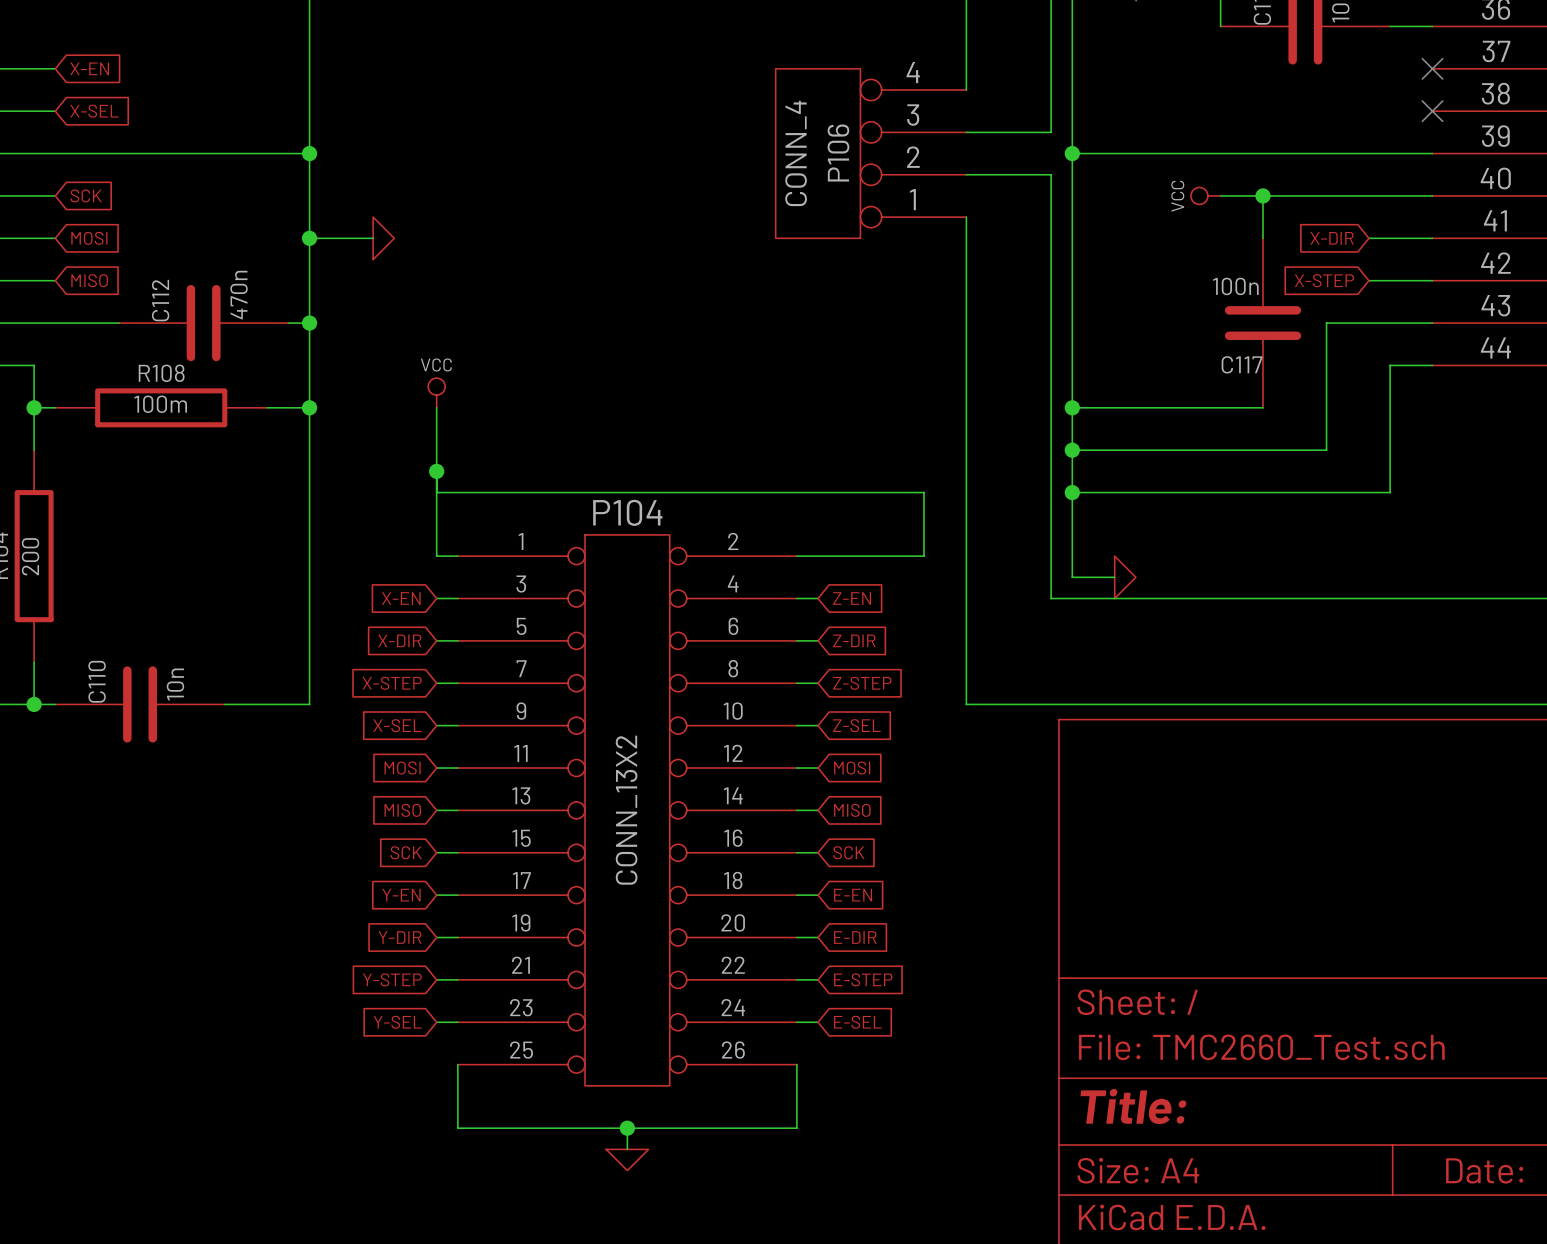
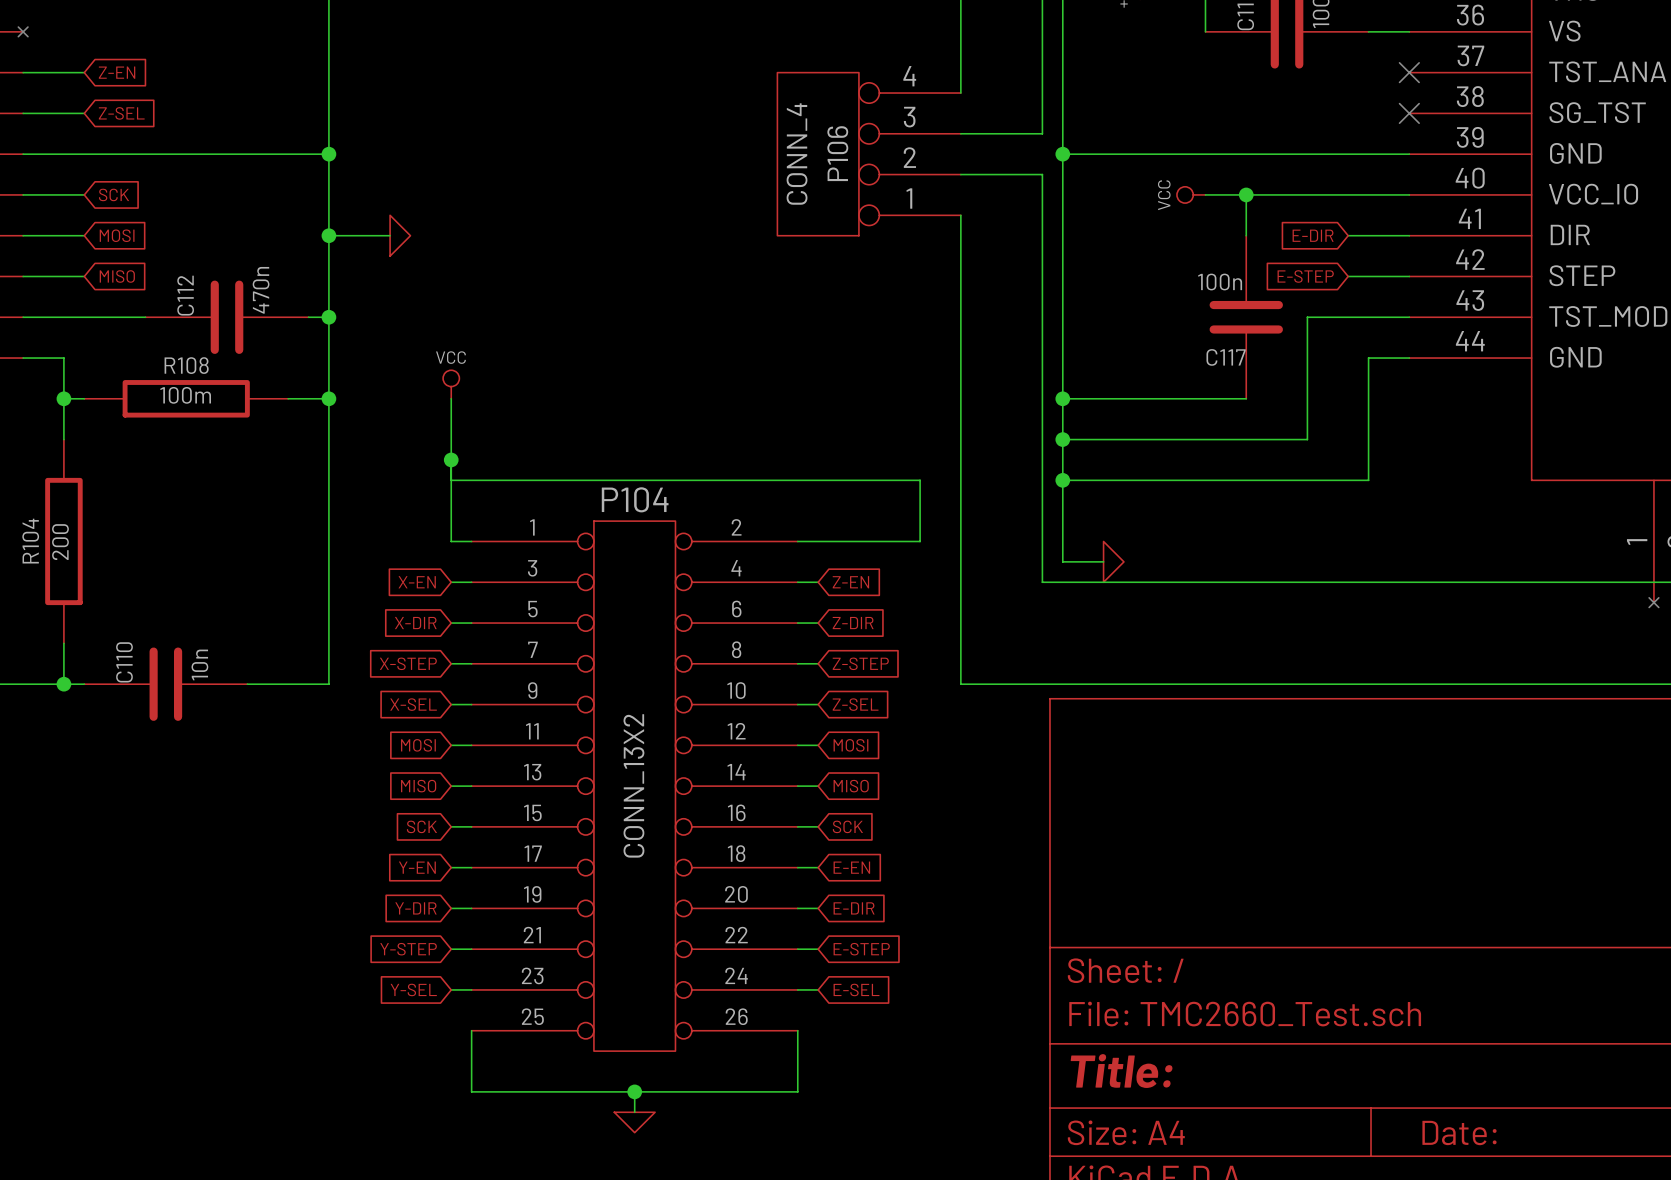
global label: X-EN (89, 68) -> Z-EN (117, 72)
global label: X-SEL (94, 111) -> Z-SEL (121, 113)
global label: X-DIR (1332, 238) -> E-DIR (1313, 235)
global label: X-STEP (1324, 280) -> E-STEP (1305, 276)

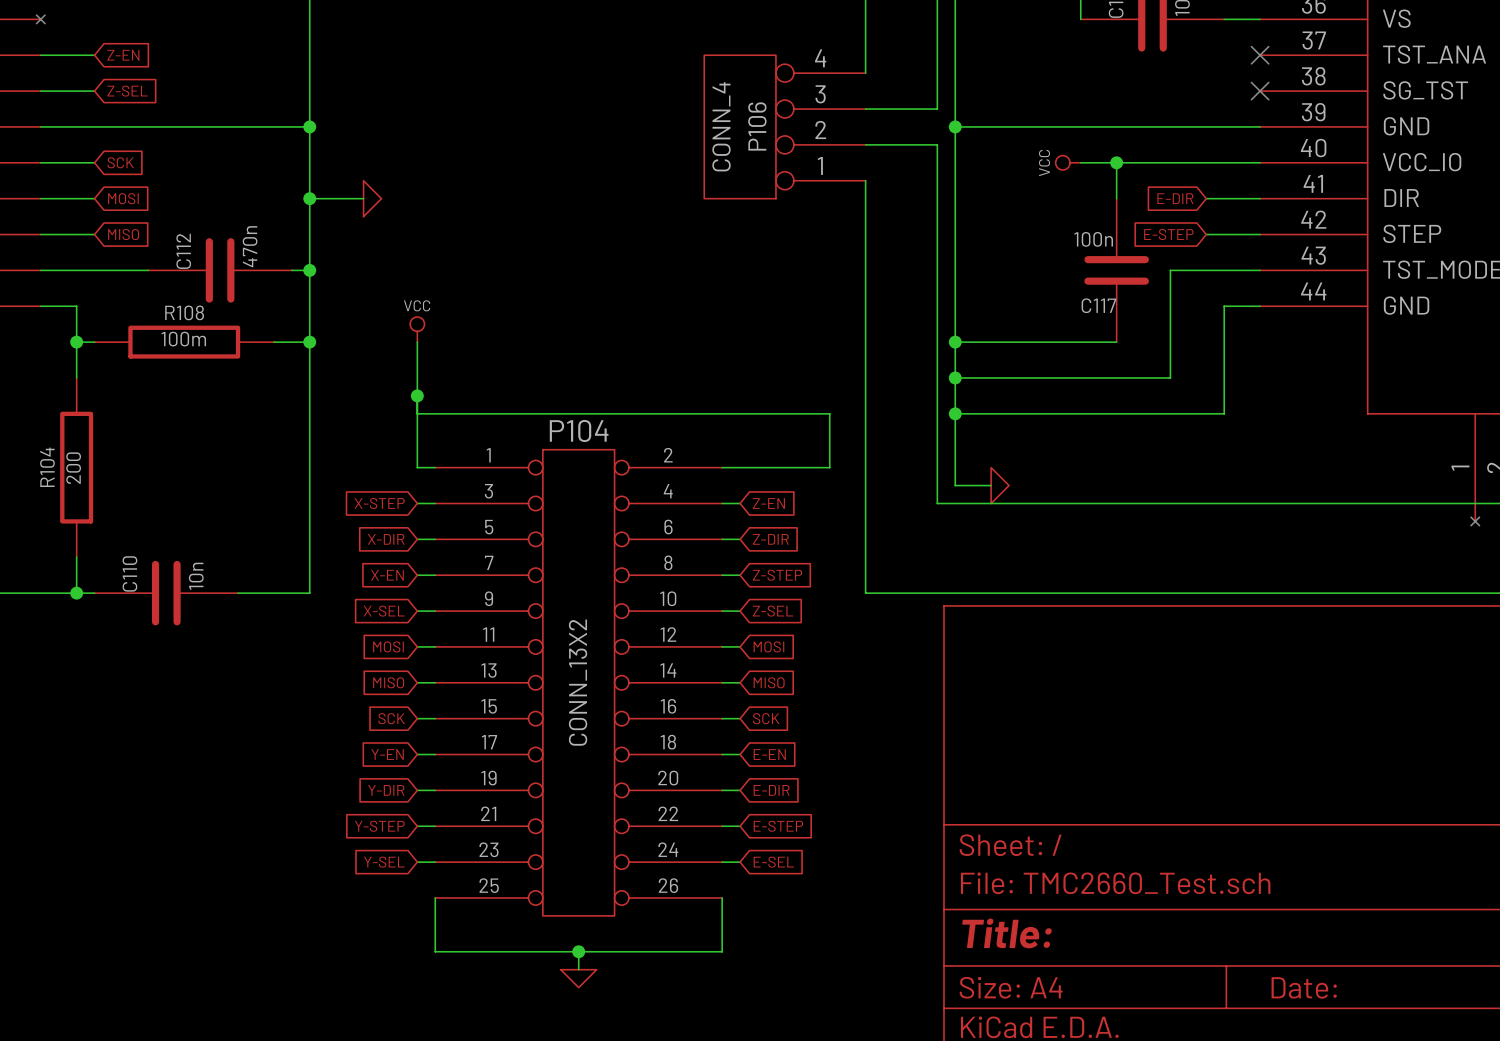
global label: X-EN (417, 582) -> X-STEP (379, 503)
global label: X-STEP (408, 663) -> X-EN (387, 575)

